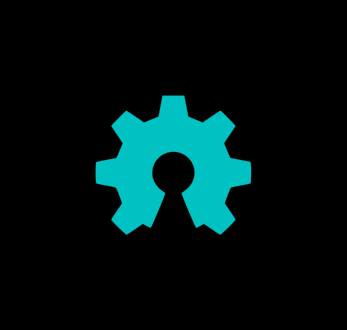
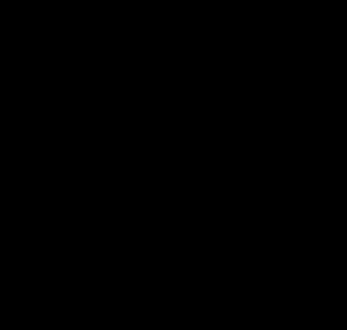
drawing: [95, 95, 252, 235] -> none

